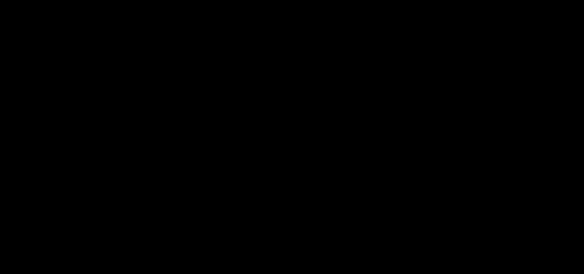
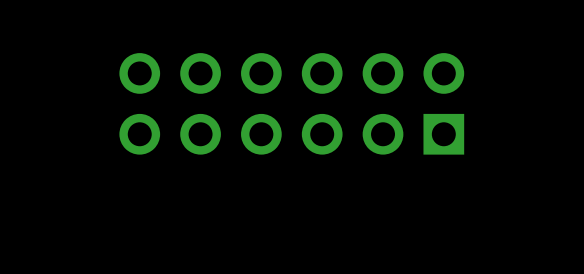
part: none -> (291, 103)

